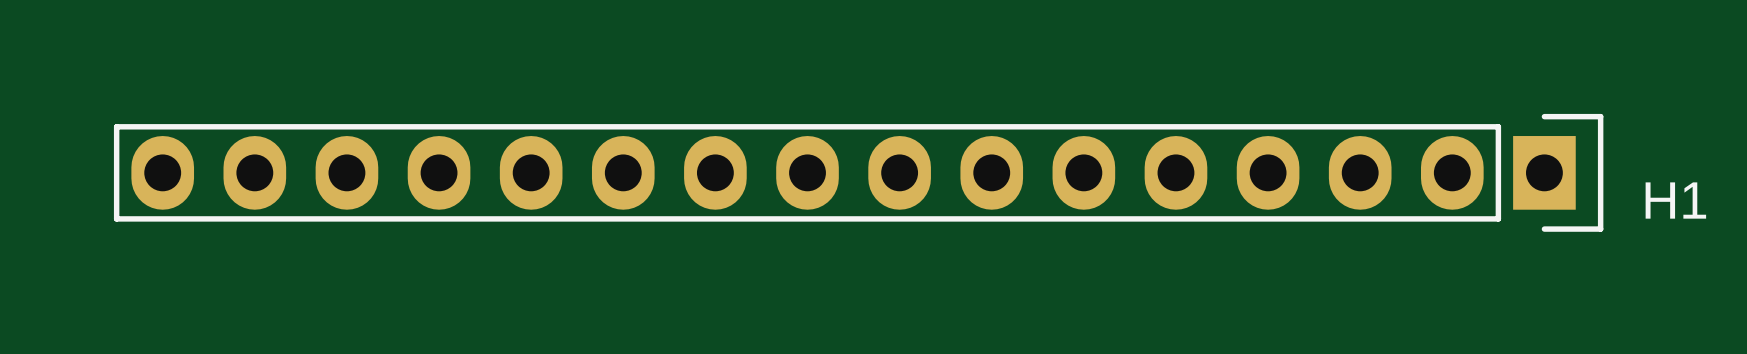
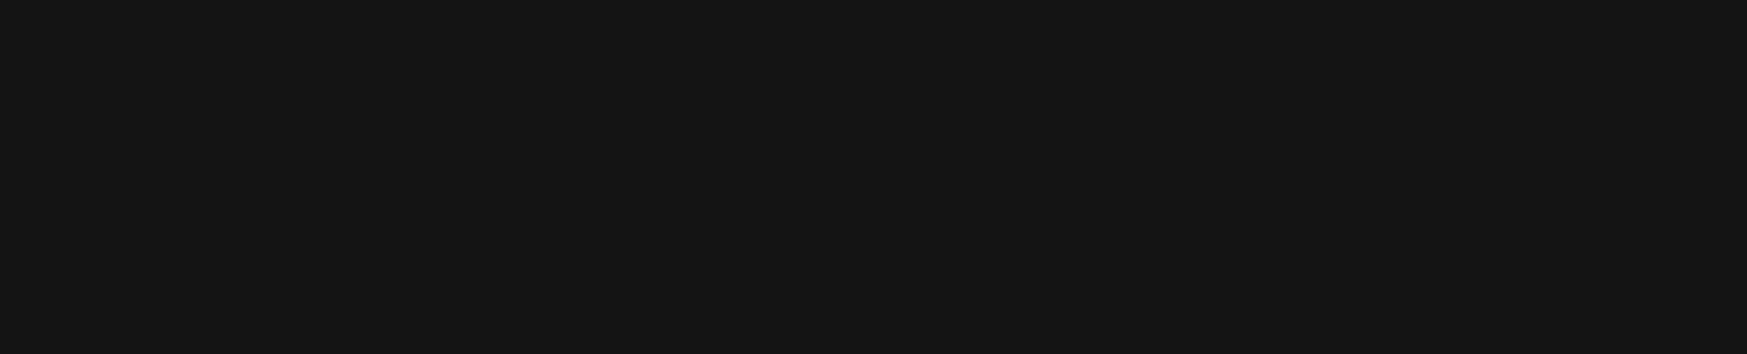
H1: (858, 172) -> none

